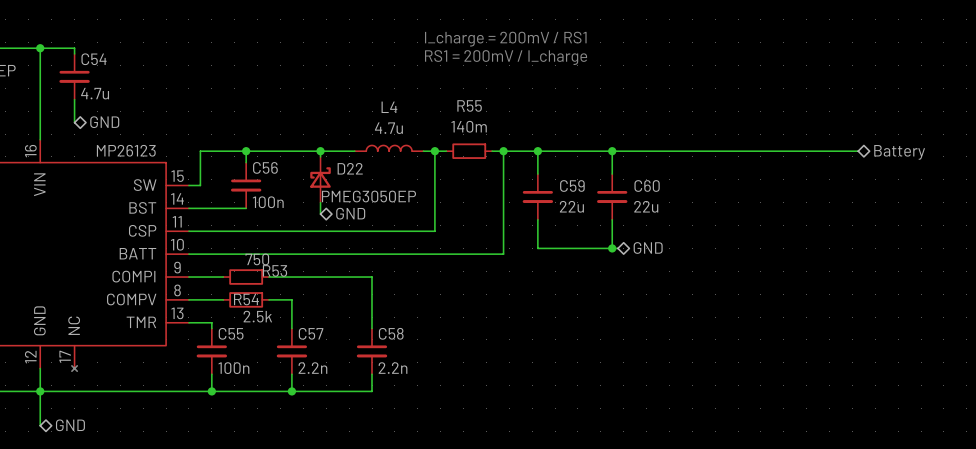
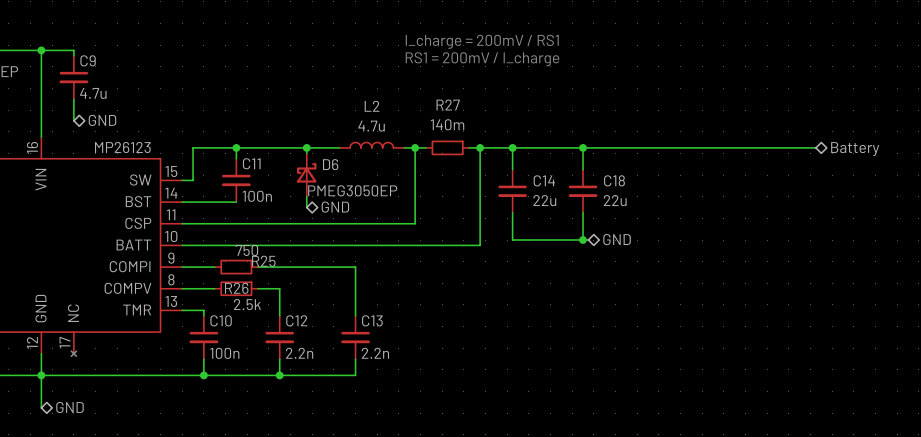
C54 name: C54 (94, 59) -> C9 (88, 60)
R55 name: R55 (469, 105) -> R27 (448, 104)
L4 name: L4 (389, 107) -> L2 (372, 106)
C56 name: C56 (265, 167) -> C11 (251, 163)
D22 name: D22 (350, 168) -> D6 (330, 164)
C59 name: C59 (572, 186) -> C14 (544, 180)
C60 name: C60 (647, 186) -> C18 (614, 180)
R53 name: R53 (275, 270) -> R25 (263, 261)
R54 name: R54 (246, 299) -> R26 (236, 288)
C55 name: C55 (231, 333) -> C10 (221, 320)
C57 name: C57 (311, 333) -> C12 (296, 320)
C58 name: C58 (391, 333) -> C13 (372, 320)

